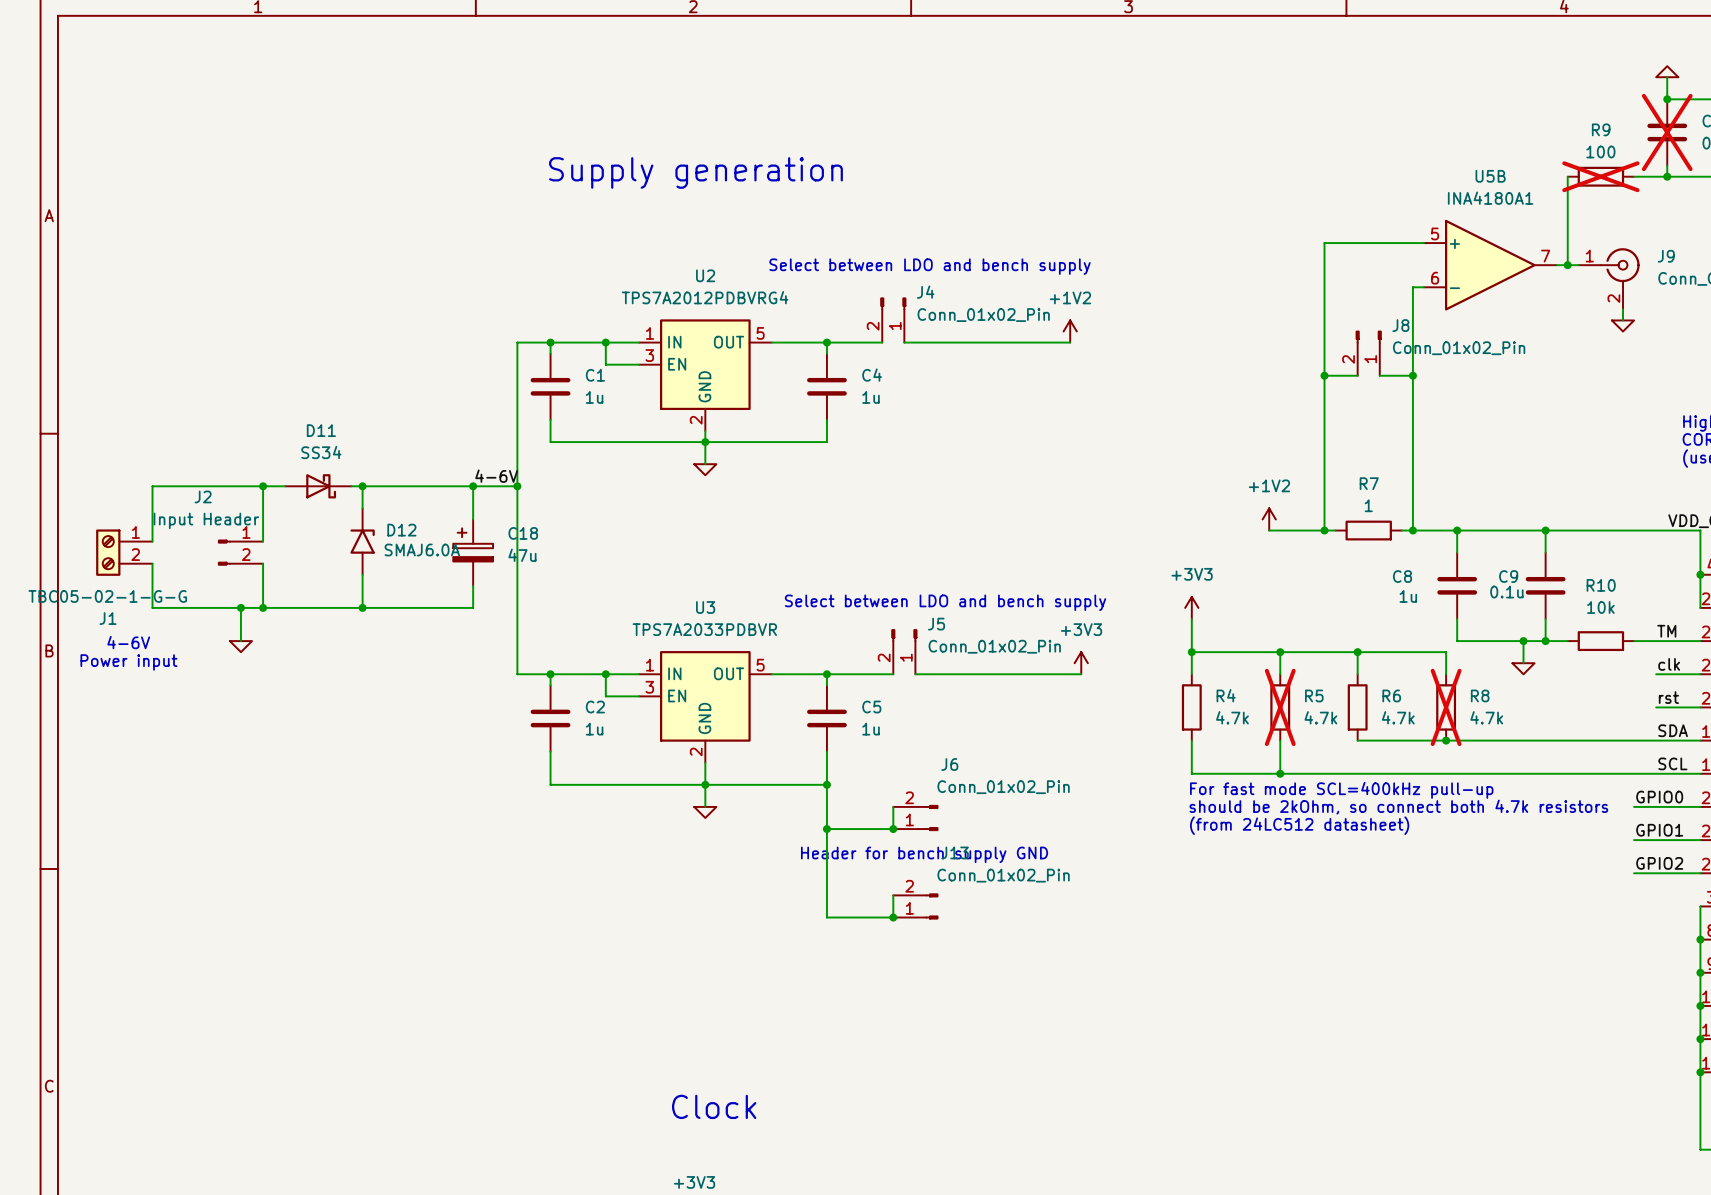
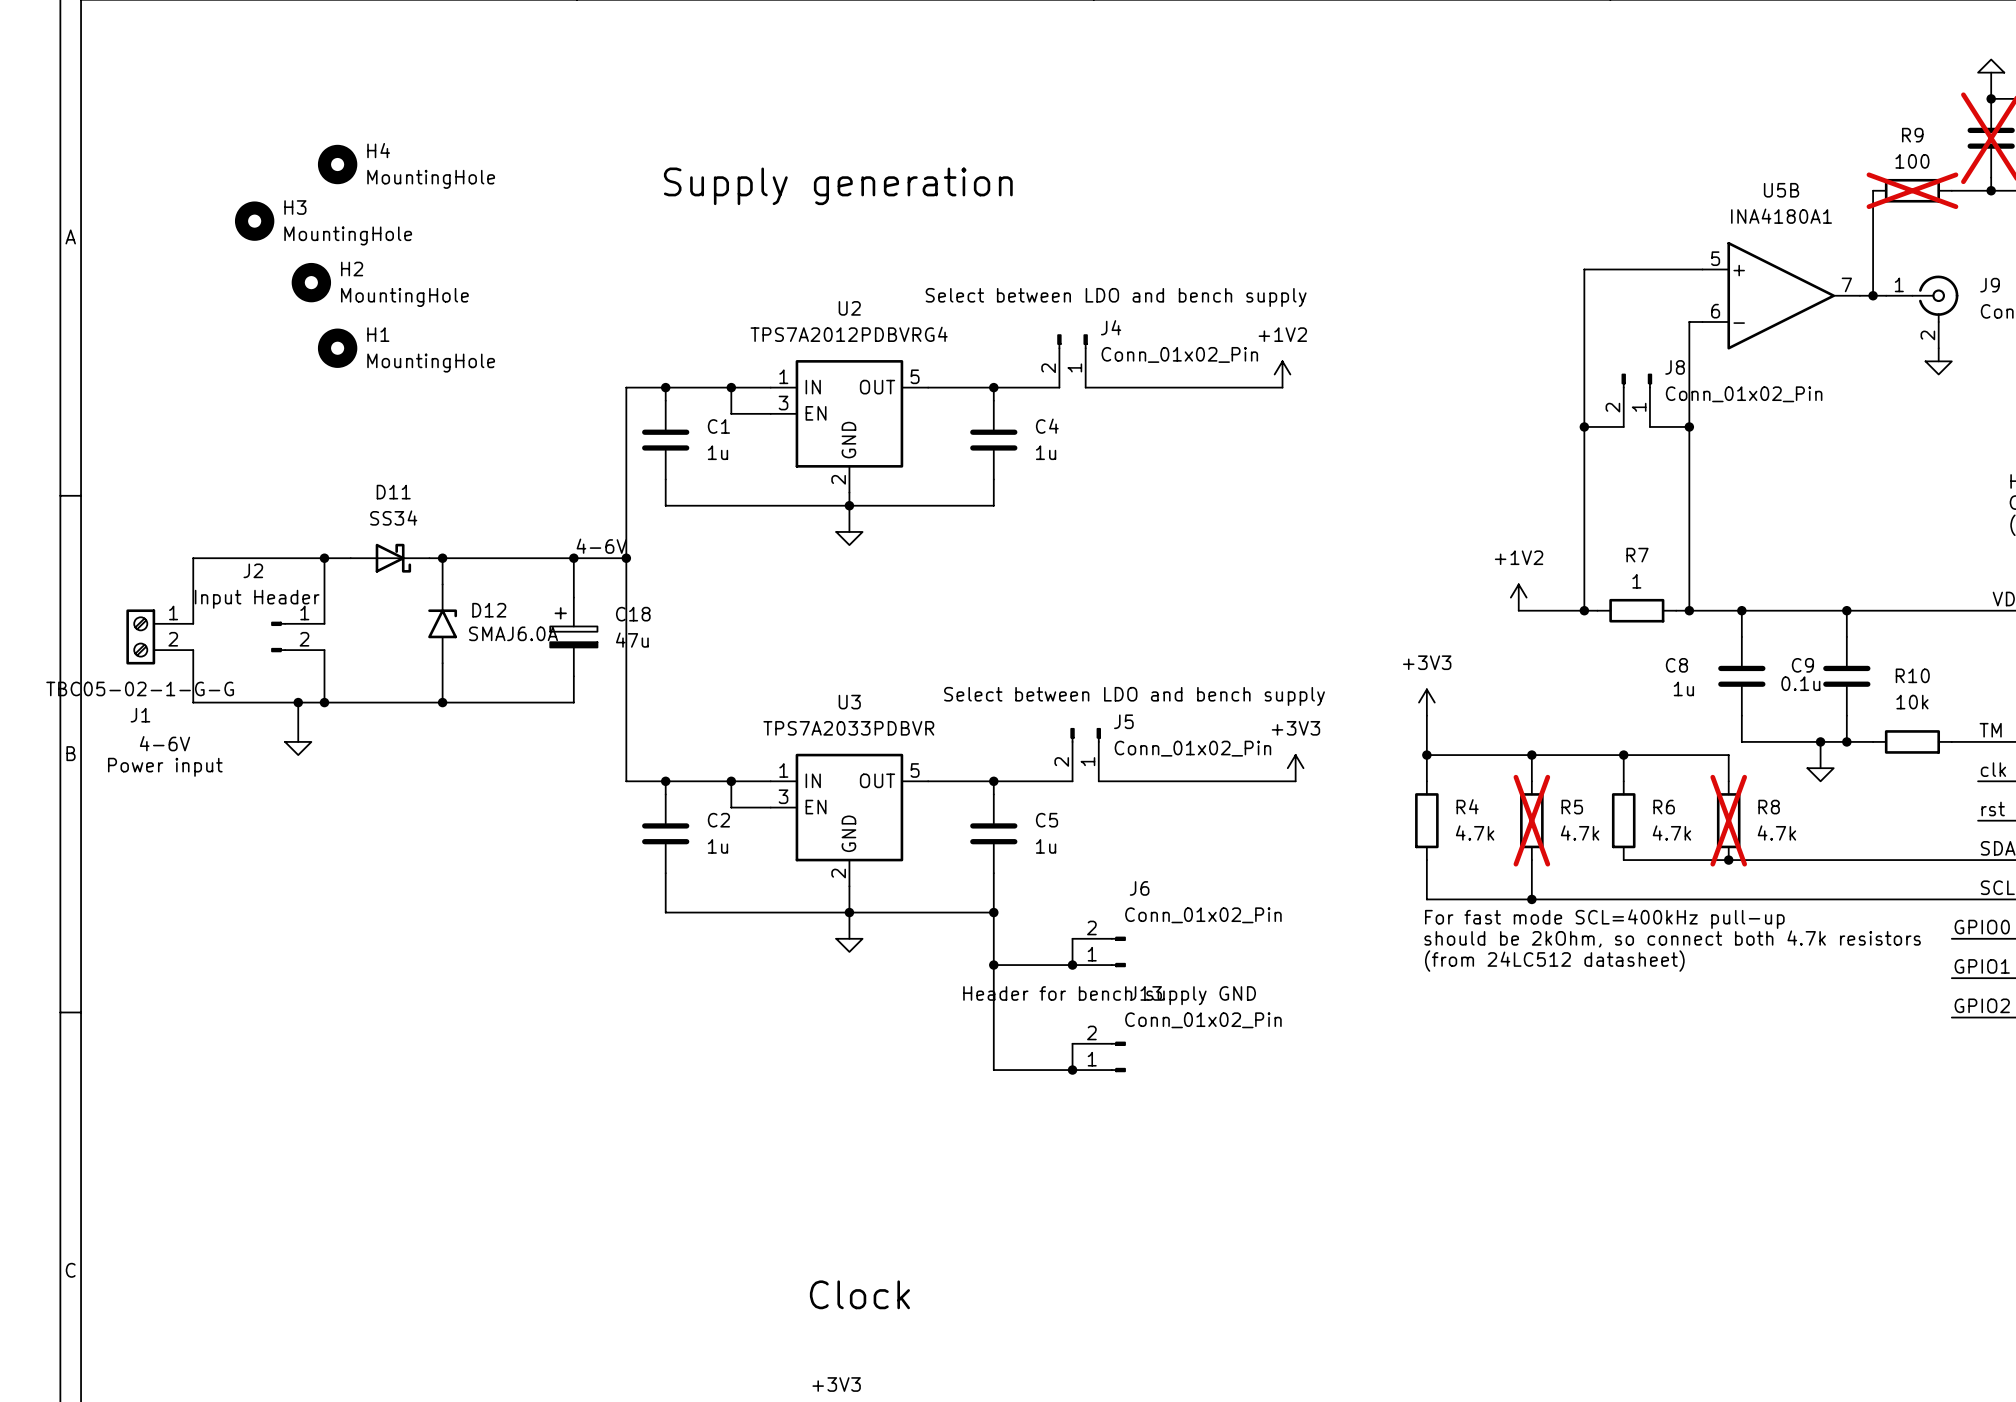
H4: none -> MountingHole (337, 164)
H3: none -> MountingHole (254, 221)
H2: none -> MountingHole (311, 282)
H1: none -> MountingHole (337, 348)

